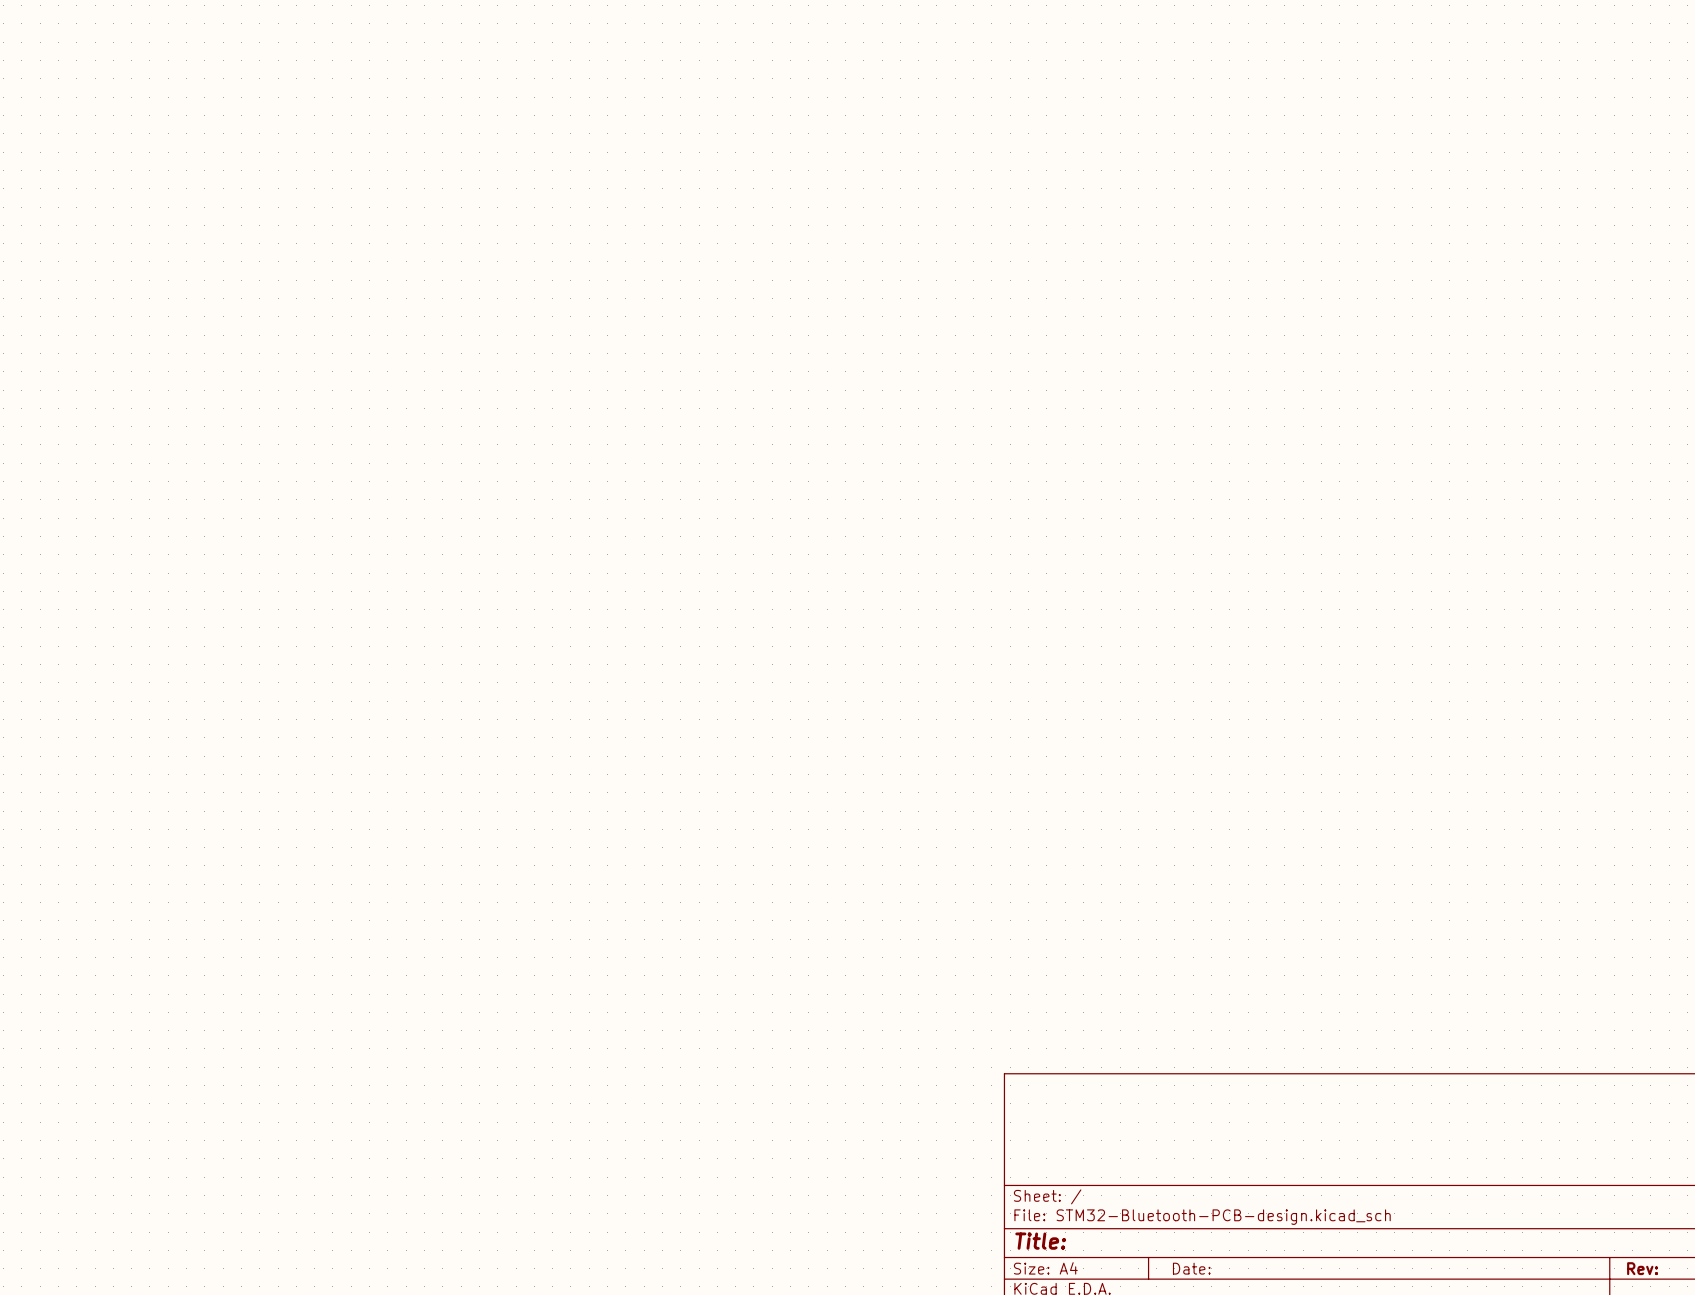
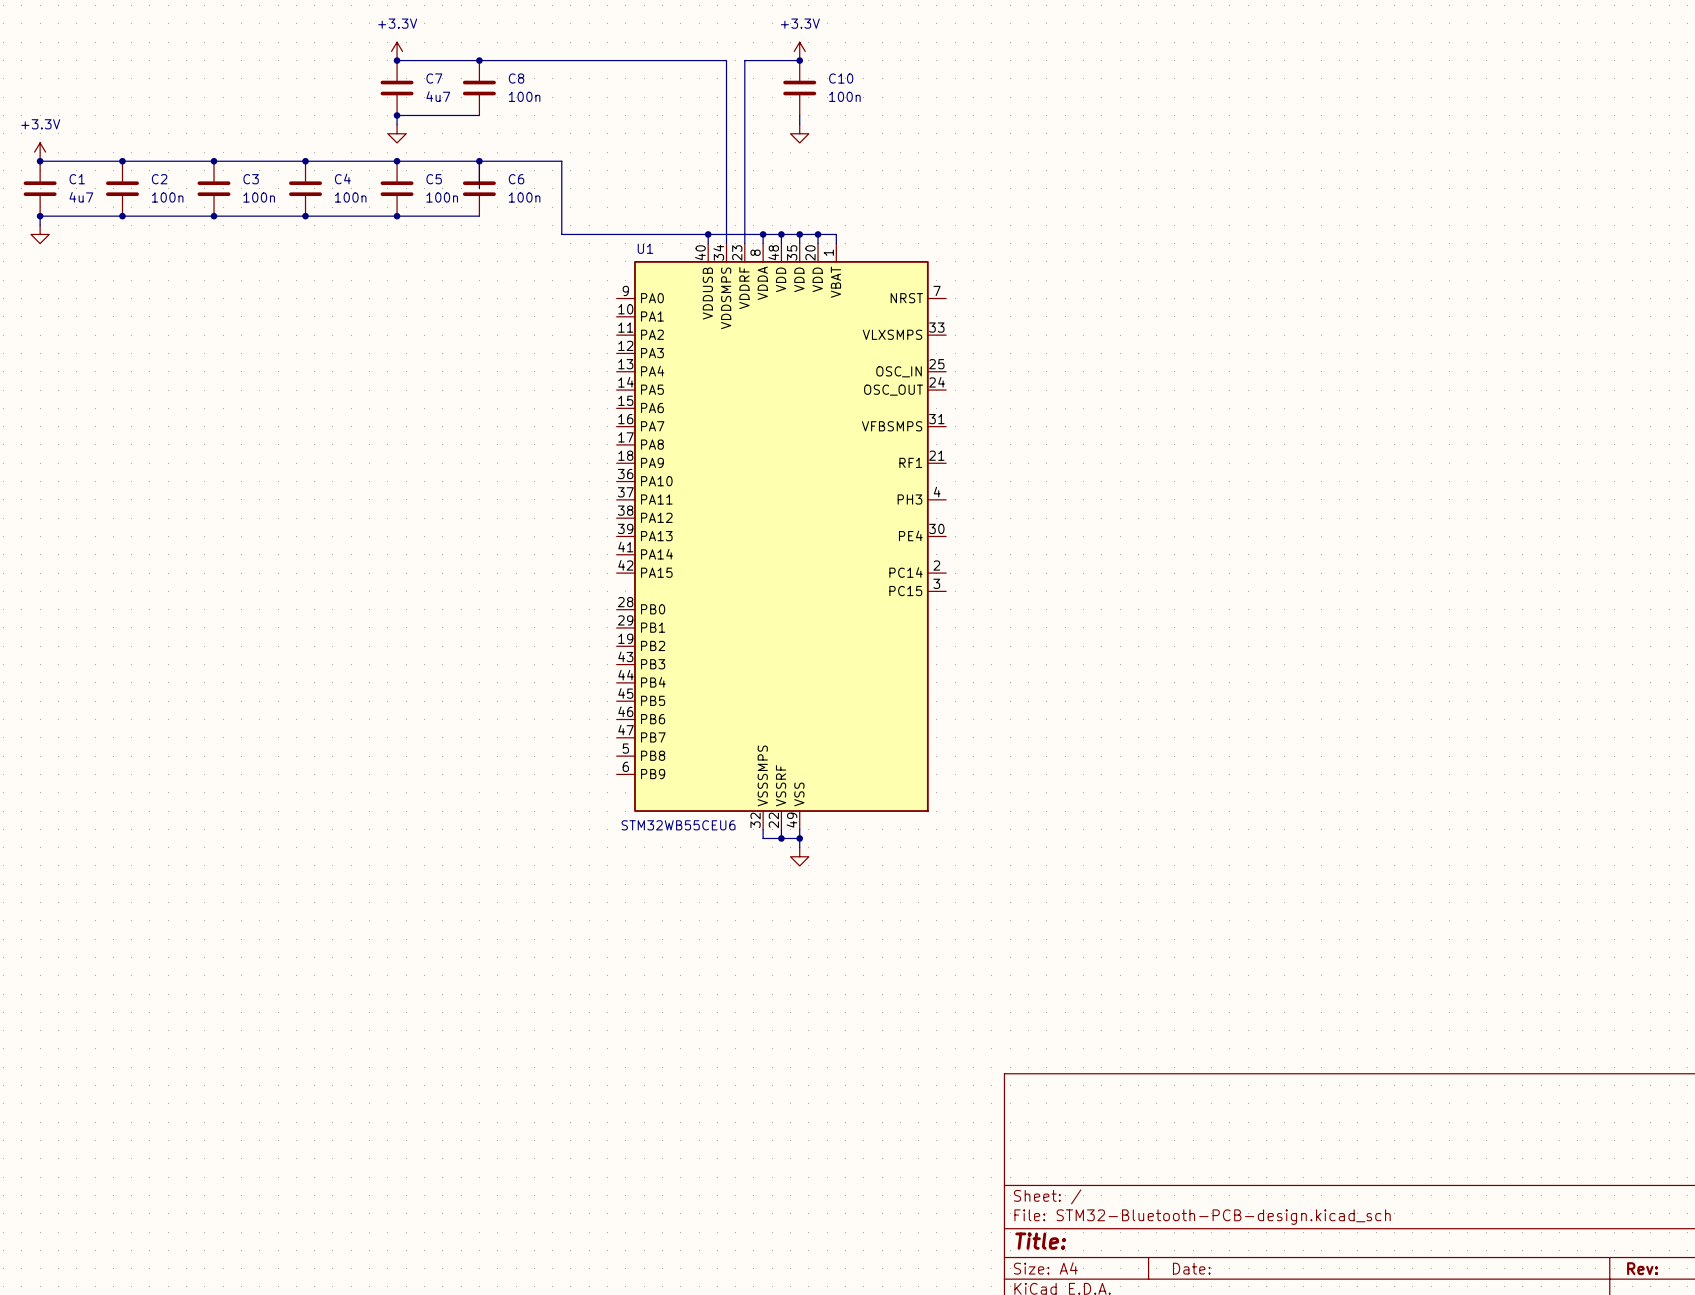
power symbol: none -> +3.3V (397, 51)
power symbol: none -> +3.3V (799, 51)
wire: none -> (397, 60) (726, 60) (726, 243)
junction: none -> (397, 60)
junction: none -> (479, 60)
wire: none -> (799, 60) (744, 60) (744, 243)
junction: none -> (799, 60)
C7: none -> 4u7 (397, 88)
C8: none -> 100n (479, 88)
C10: none -> 100n (799, 88)
junction: none -> (397, 115)
wire: none -> (479, 115) (397, 115) (397, 124)
wire: none -> (799, 115) (799, 124)
power symbol: none -> (397, 133)
power symbol: none -> (799, 133)
power symbol: none -> +3.3V (40, 152)
wire: none -> (40, 161) (561, 161) (561, 234) (836, 234) (836, 243)
junction: none -> (40, 161)
junction: none -> (122, 161)
junction: none -> (214, 161)
junction: none -> (305, 161)
junction: none -> (397, 161)
wire: none -> (479, 161) (479, 188)
junction: none -> (479, 161)
C1: none -> 4u7 (40, 188)
C2: none -> 100n (122, 188)
C3: none -> 100n (214, 188)
C4: none -> 100n (305, 188)
C5: none -> 100n (397, 188)
C6: none -> 100n (479, 188)
junction: none -> (40, 216)
junction: none -> (122, 216)
junction: none -> (214, 216)
junction: none -> (305, 216)
junction: none -> (397, 216)
wire: none -> (479, 216) (40, 216) (40, 225)
power symbol: none -> (40, 234)
wire: none -> (708, 234) (708, 243)
junction: none -> (708, 234)
wire: none -> (763, 234) (763, 243)
junction: none -> (763, 234)
wire: none -> (781, 234) (781, 243)
junction: none -> (781, 234)
wire: none -> (799, 234) (799, 243)
junction: none -> (799, 234)
wire: none -> (818, 234) (818, 243)
junction: none -> (818, 234)
U1: none -> STM32WB55CEU6 (781, 536)
wire: none -> (763, 829) (763, 838) (799, 838)
wire: none -> (781, 829) (781, 838)
wire: none -> (799, 829) (799, 847)
junction: none -> (781, 838)
junction: none -> (799, 838)
power symbol: none -> (799, 856)

